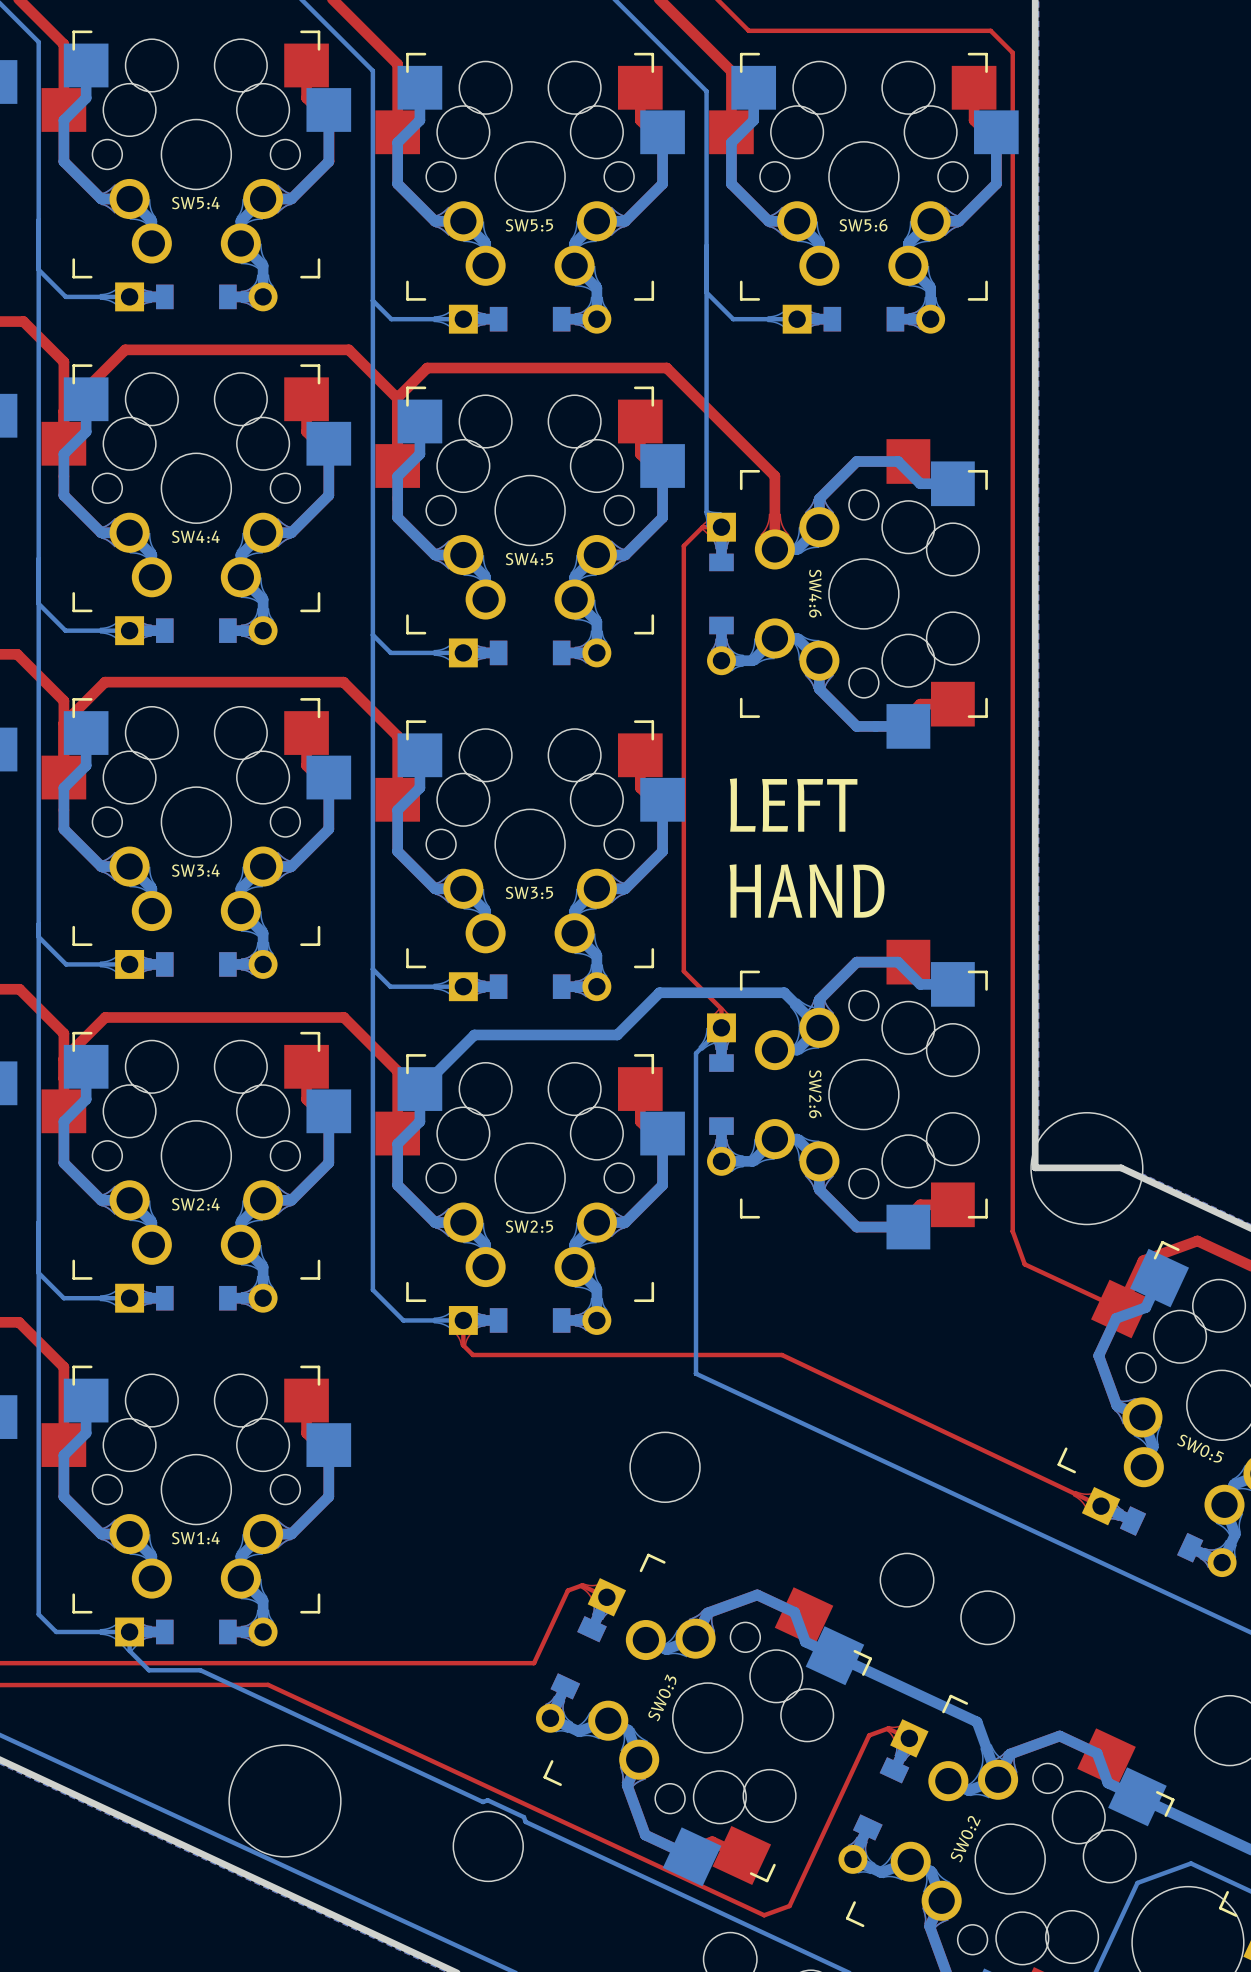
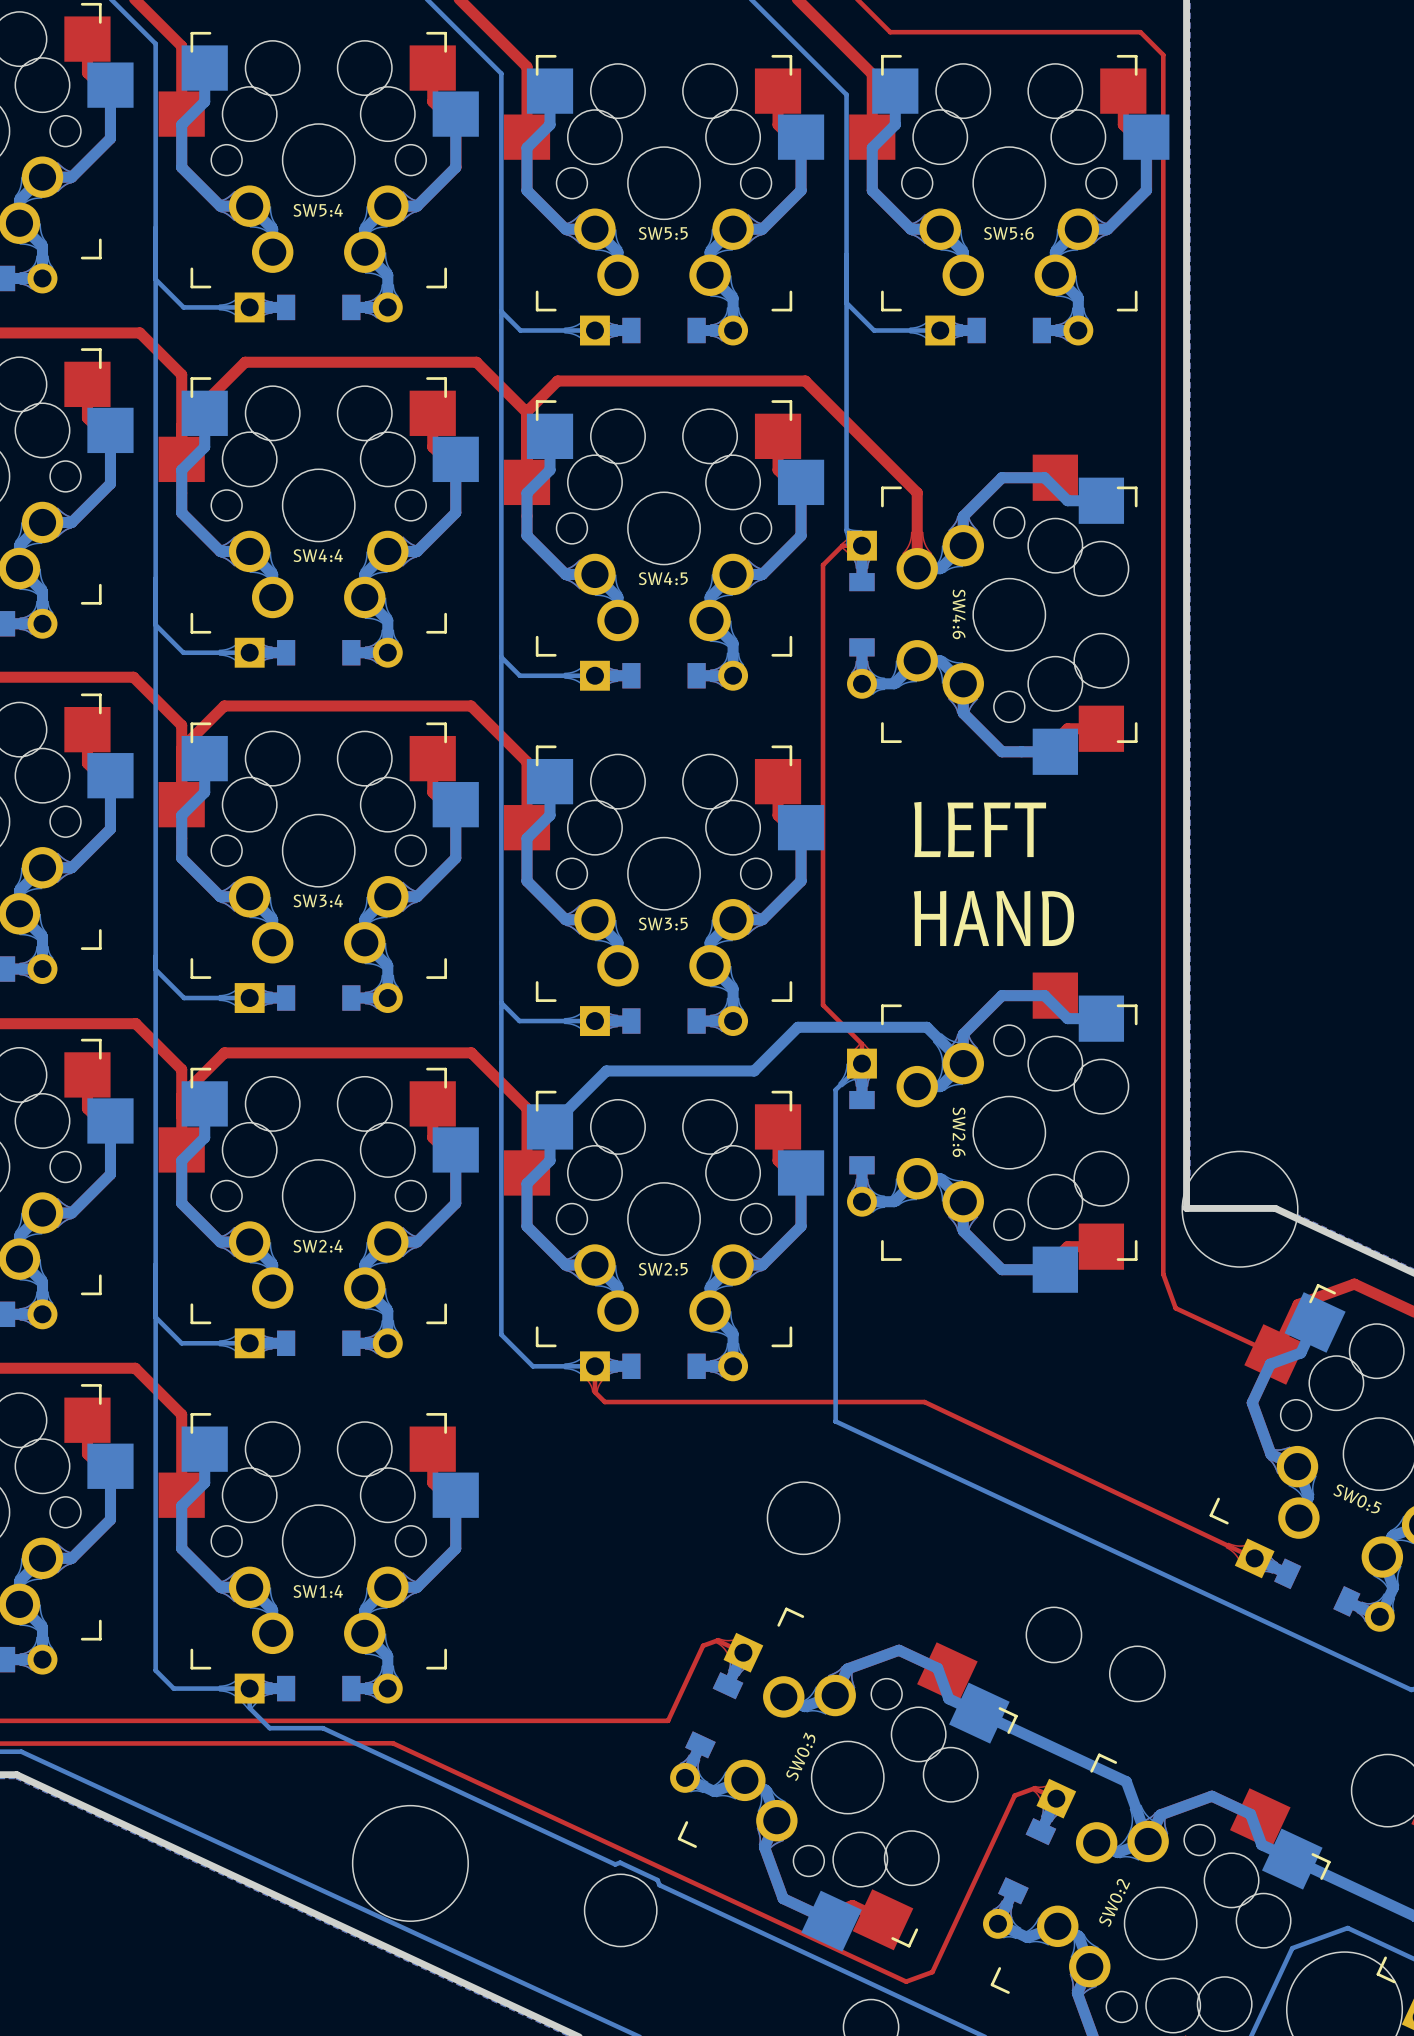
text position: LEFT (793, 805) -> LEFT (980, 829)
text position: HAND (807, 891) -> HAND (994, 918)

